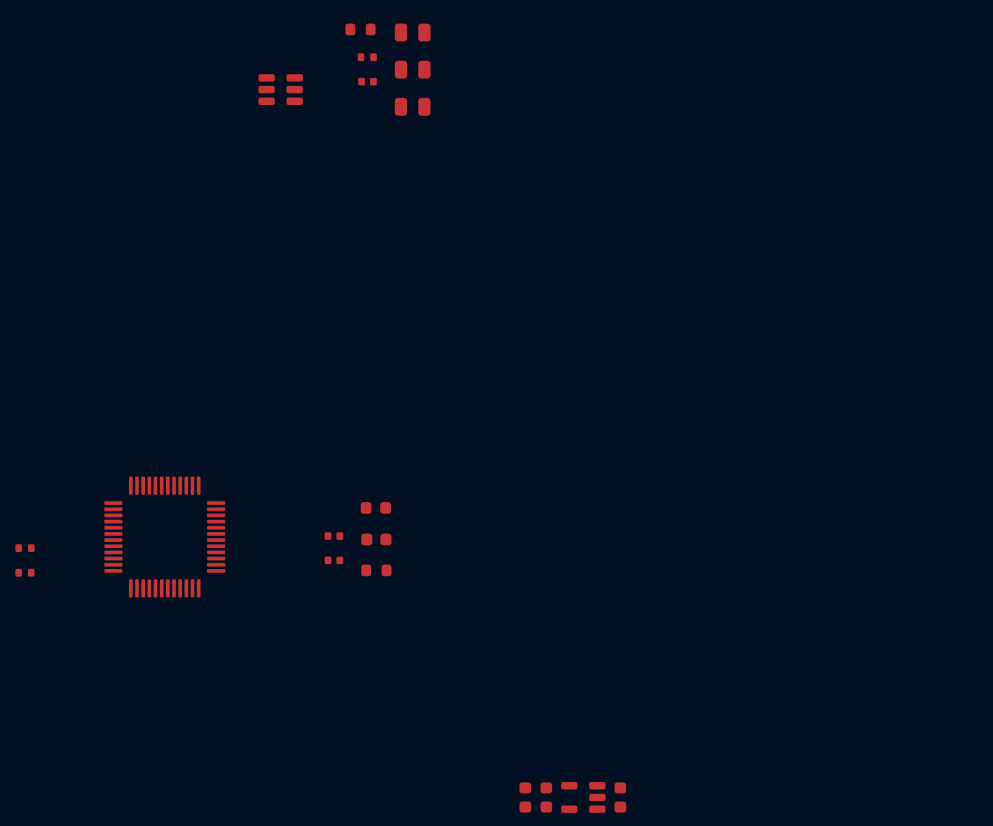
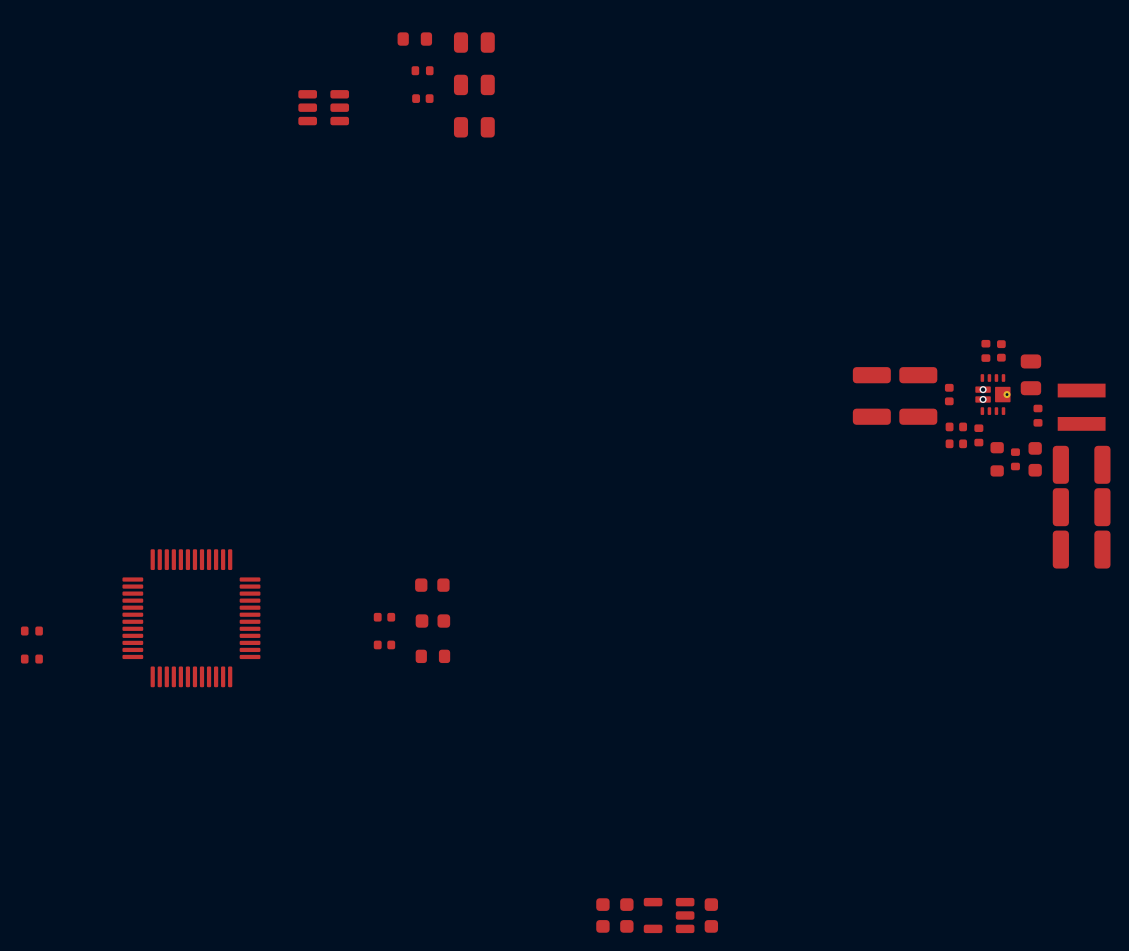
part: none -> (985, 350)
part: none -> (1001, 350)
part: none -> (1030, 374)
via: none -> (983, 389)
part: none -> (949, 394)
part: none -> (992, 394)
part: none -> (871, 395)
part: none -> (918, 395)
via: none -> (983, 399)
part: none -> (1081, 407)
part: none -> (1037, 415)
part: none -> (956, 426)
part: none -> (978, 435)
part: none -> (956, 443)
part: none -> (997, 459)
part: none -> (1015, 459)
part: none -> (1035, 459)
part: none -> (1081, 464)
part: none -> (1081, 507)
part: none -> (1081, 549)

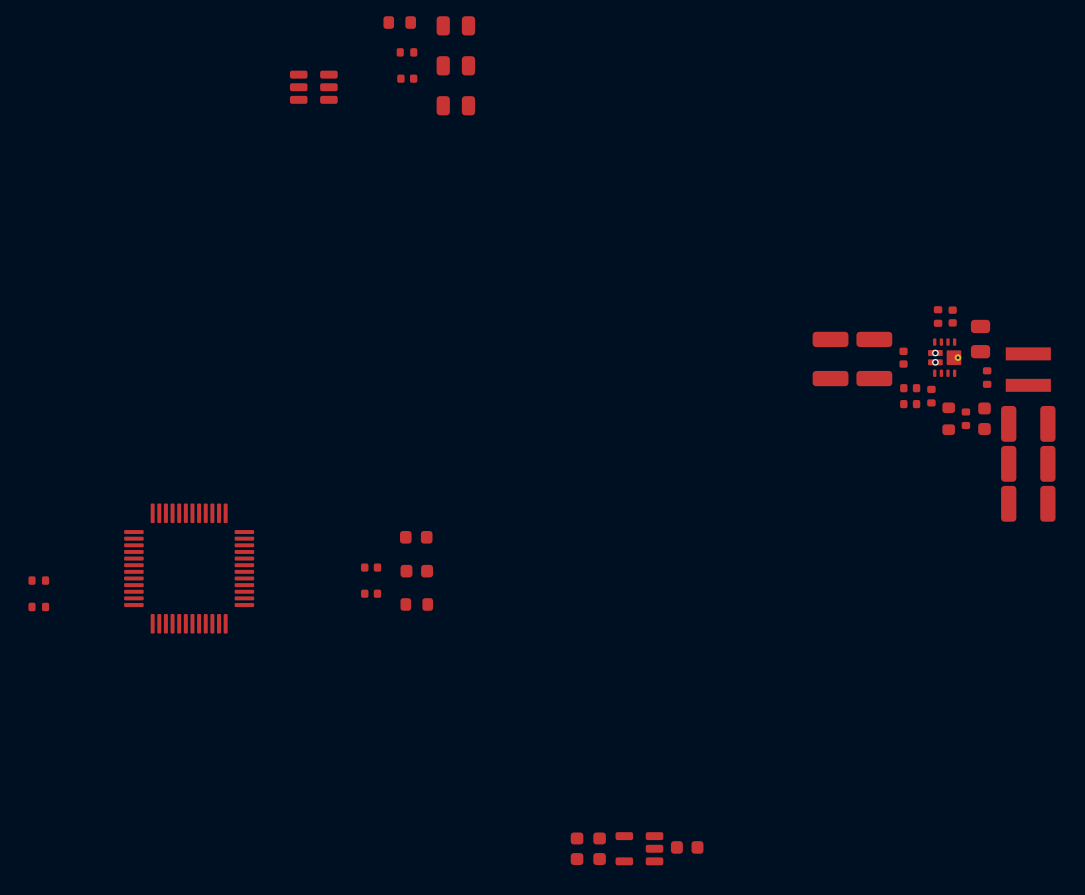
part rotation: 0° (711, 915) -> 90° clockwise (687, 847)

